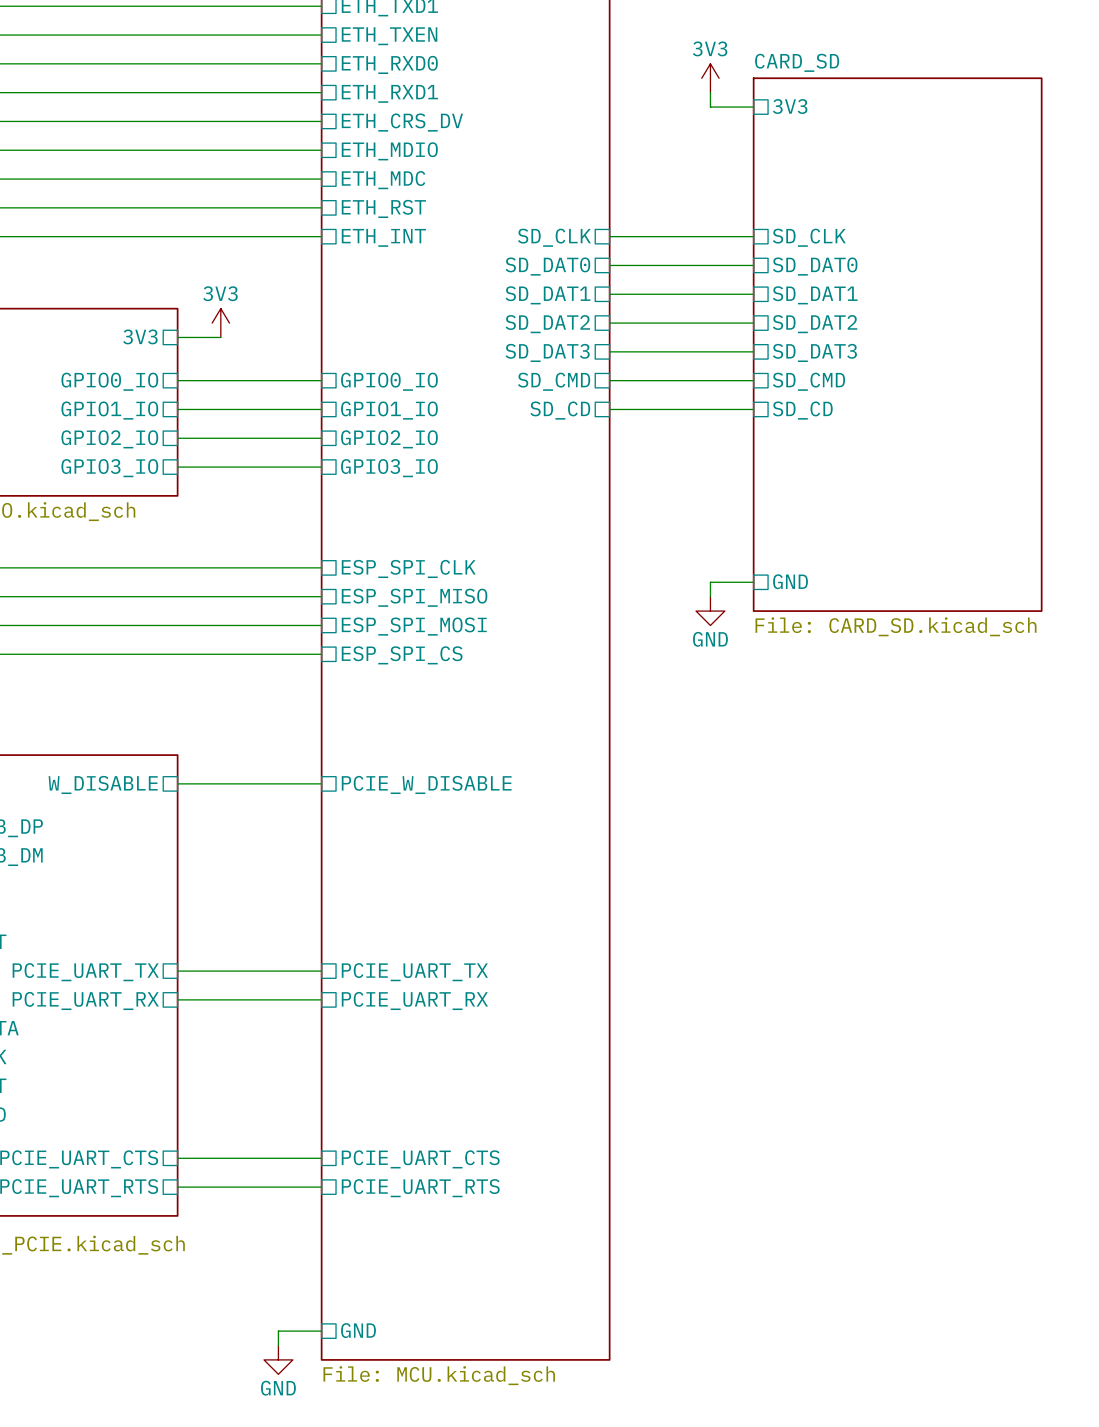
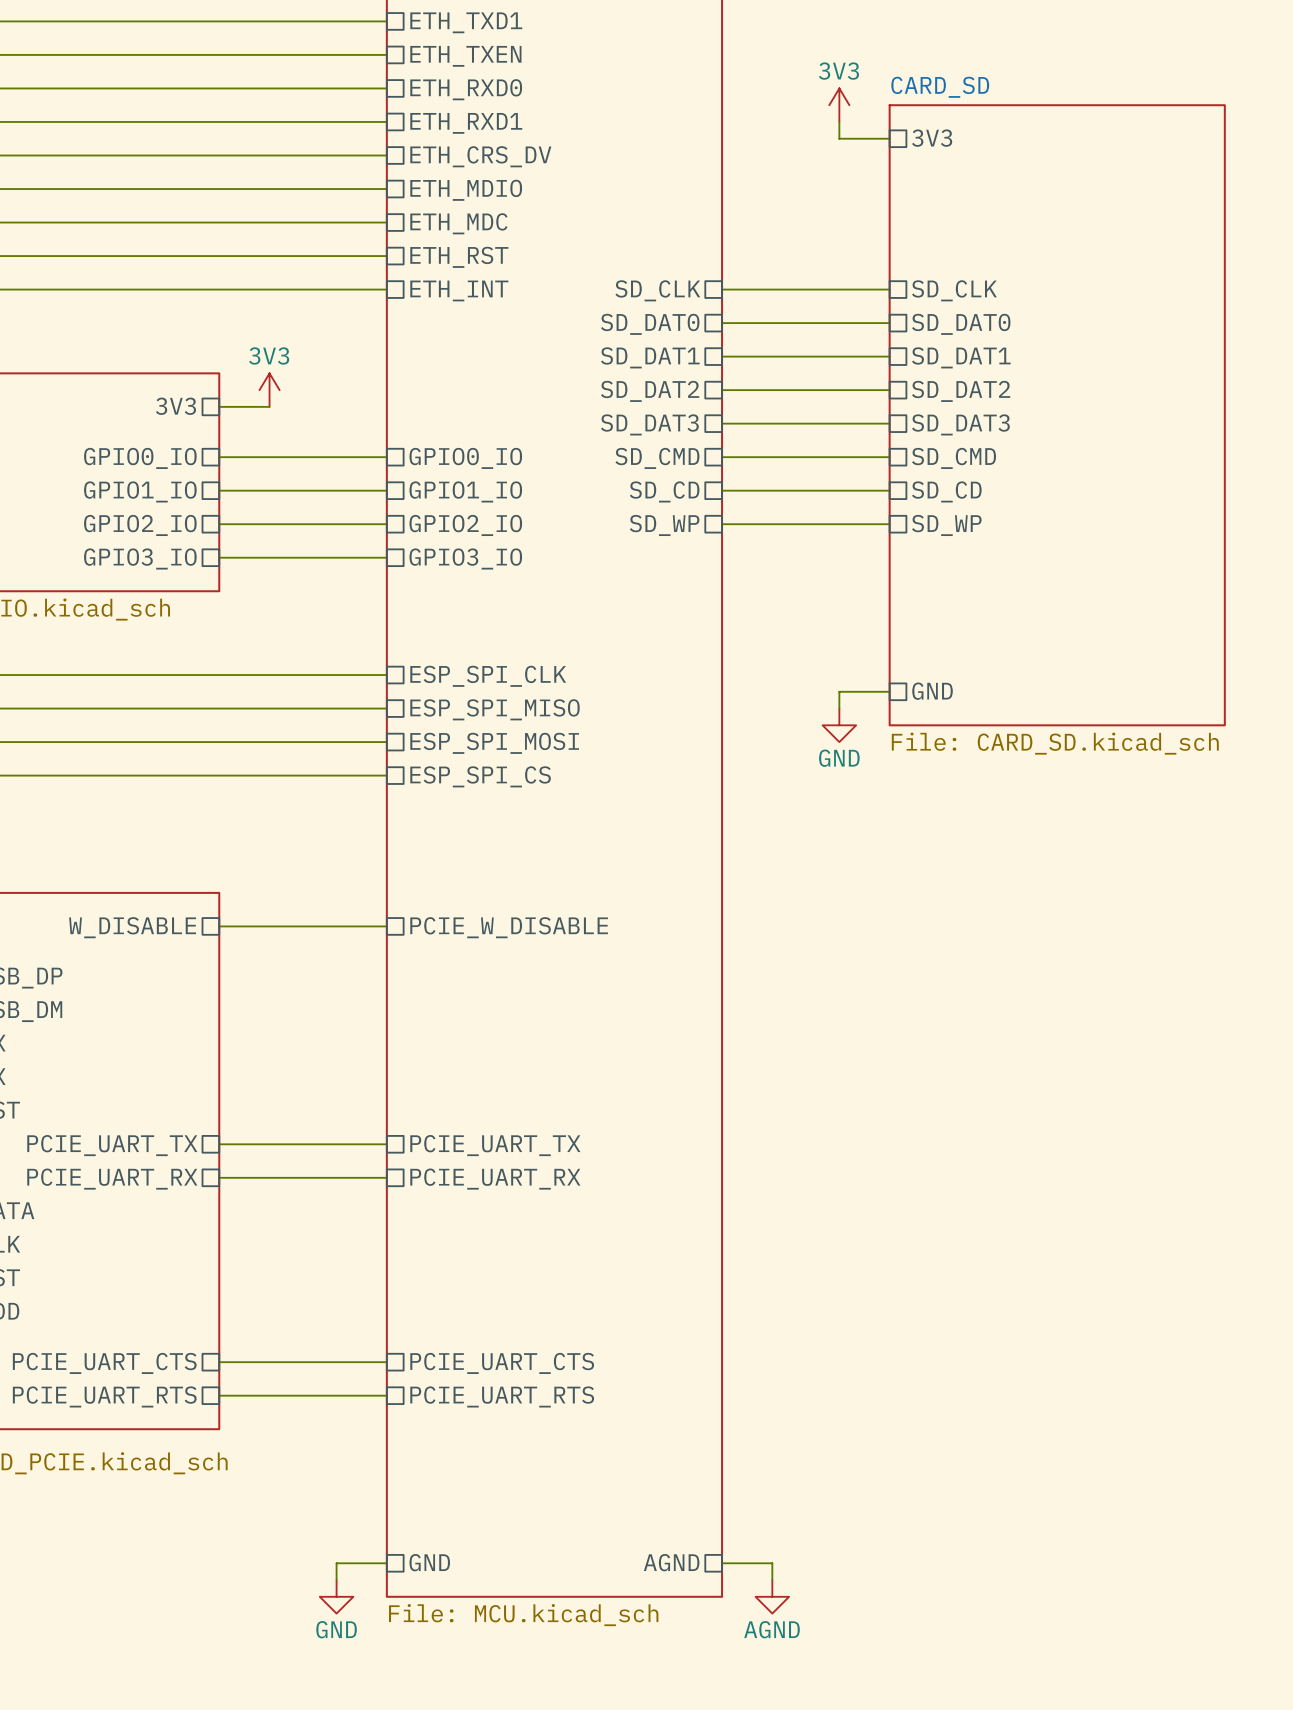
wire: none -> (722, 524) (889, 524)
sheet pin: none -> SD_WP (664, 525)
sheet pin: none -> SD_WP (946, 525)
sheet pin: none -> AGND (671, 1562)
wire: none -> (722, 1563) (772, 1563) (772, 1580)
power symbol: none -> AGND (772, 1596)

